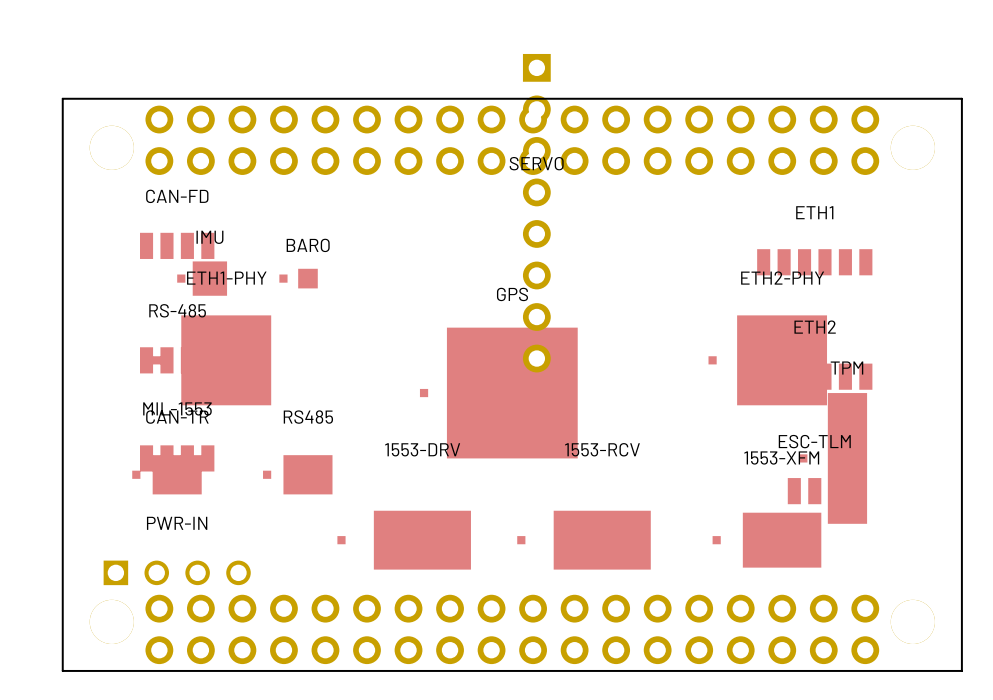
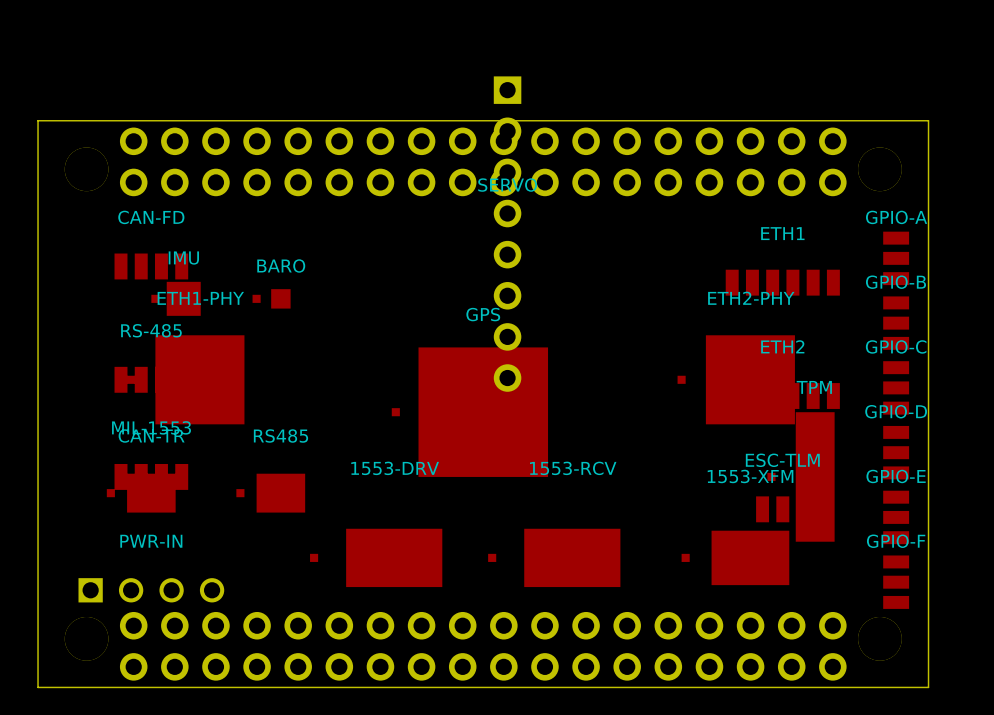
GPIO-A: none -> (896, 258)
GPIO-B: none -> (896, 323)
GPIO-C: none -> (896, 387)
GPIO-D: none -> (896, 452)
GPIO-E: none -> (896, 517)
GPIO-F: none -> (896, 582)

